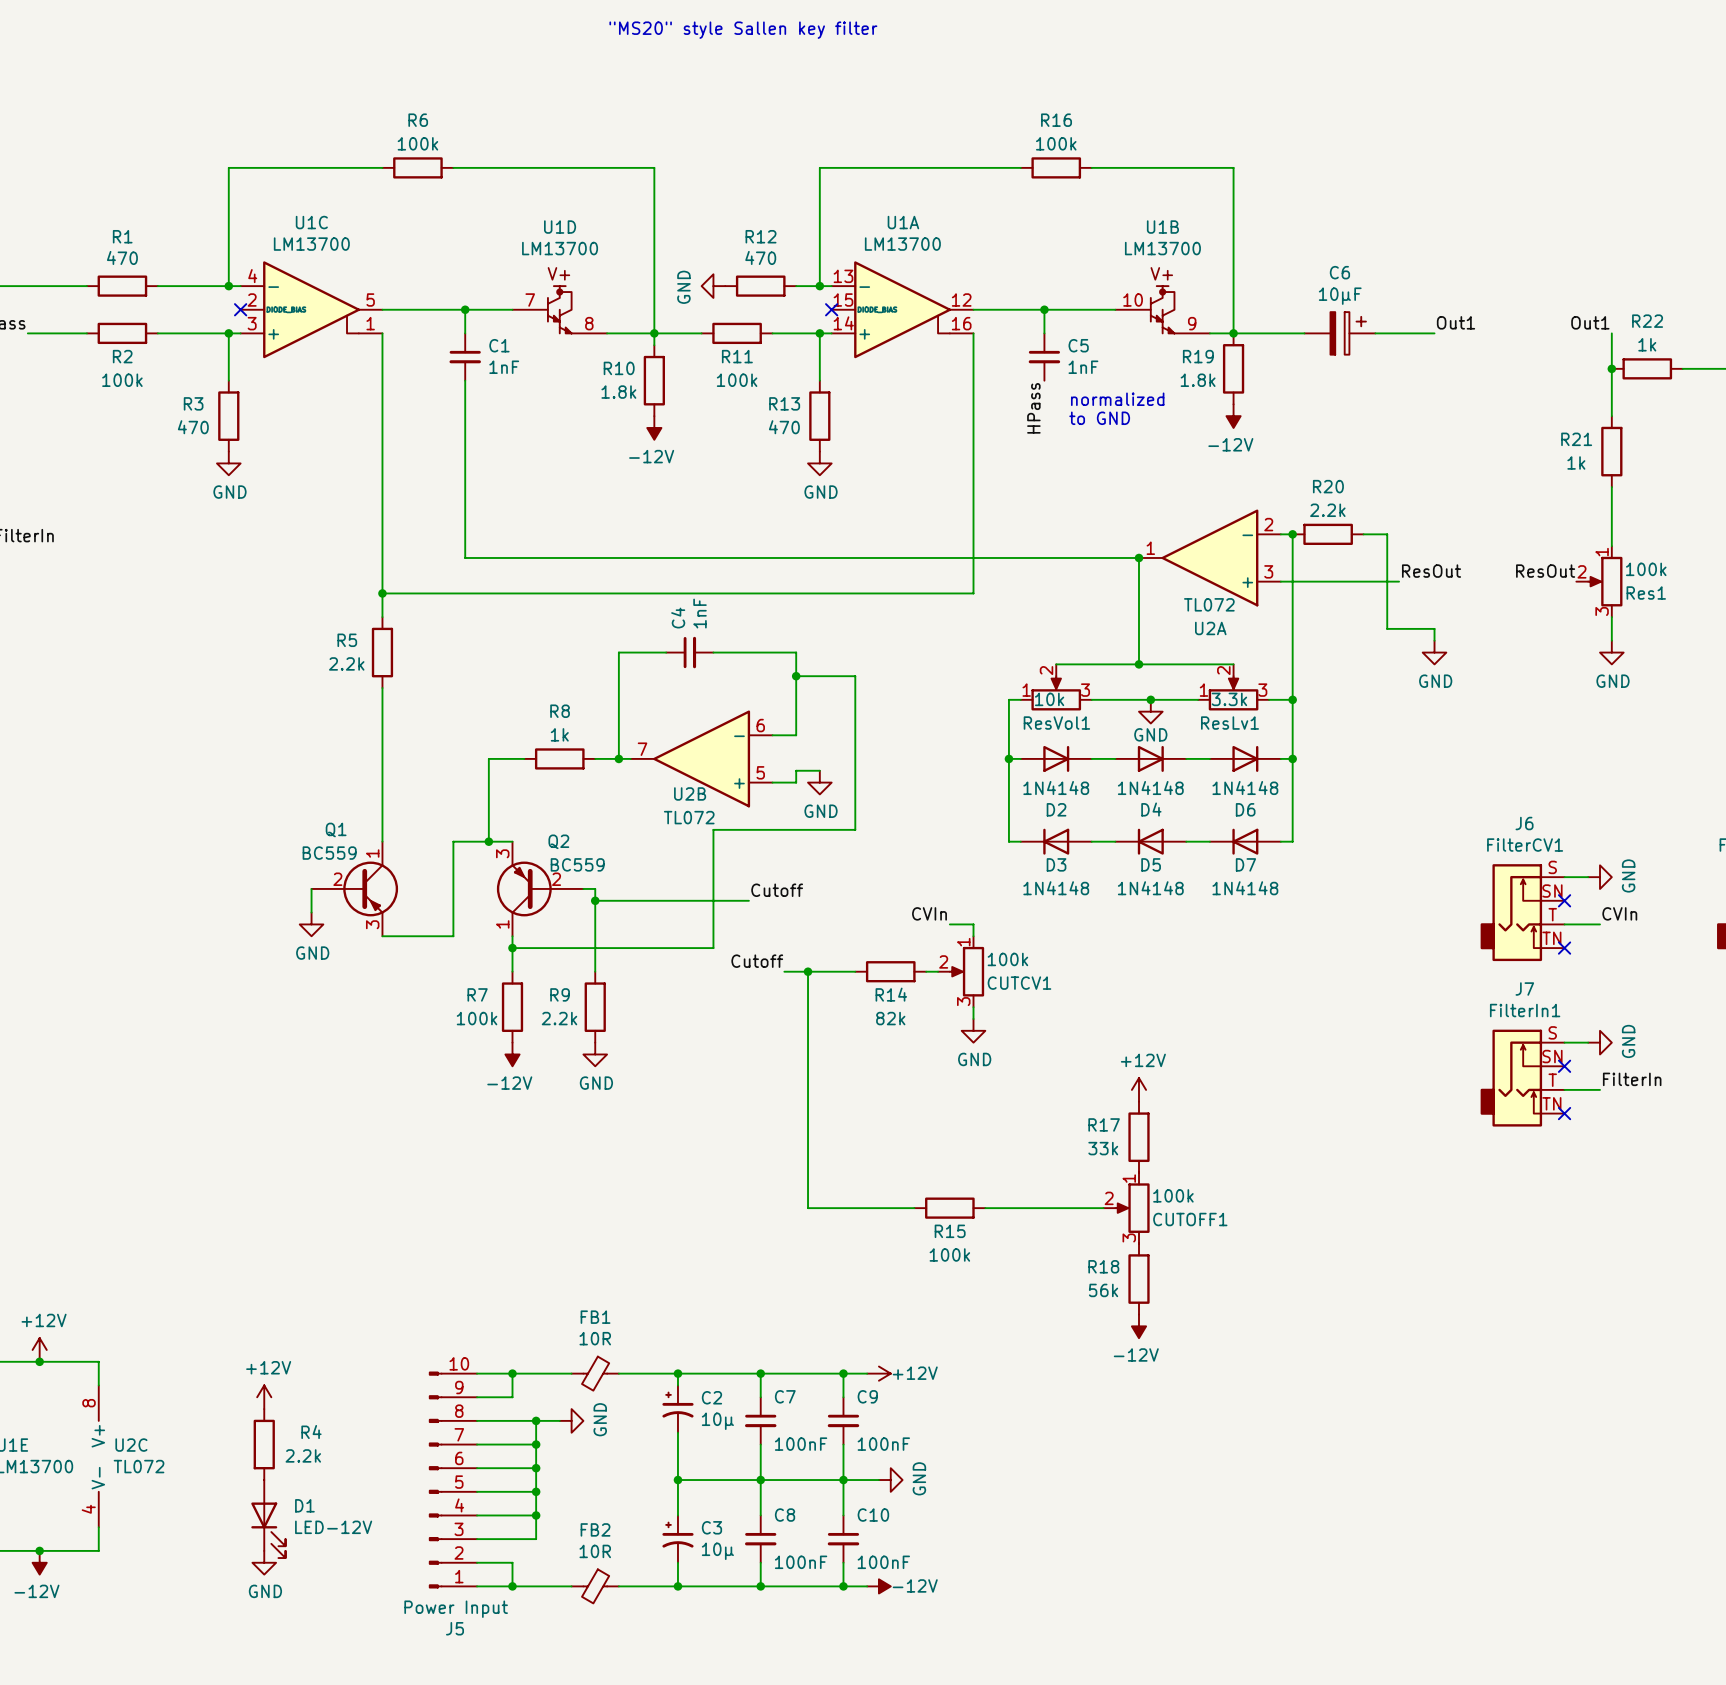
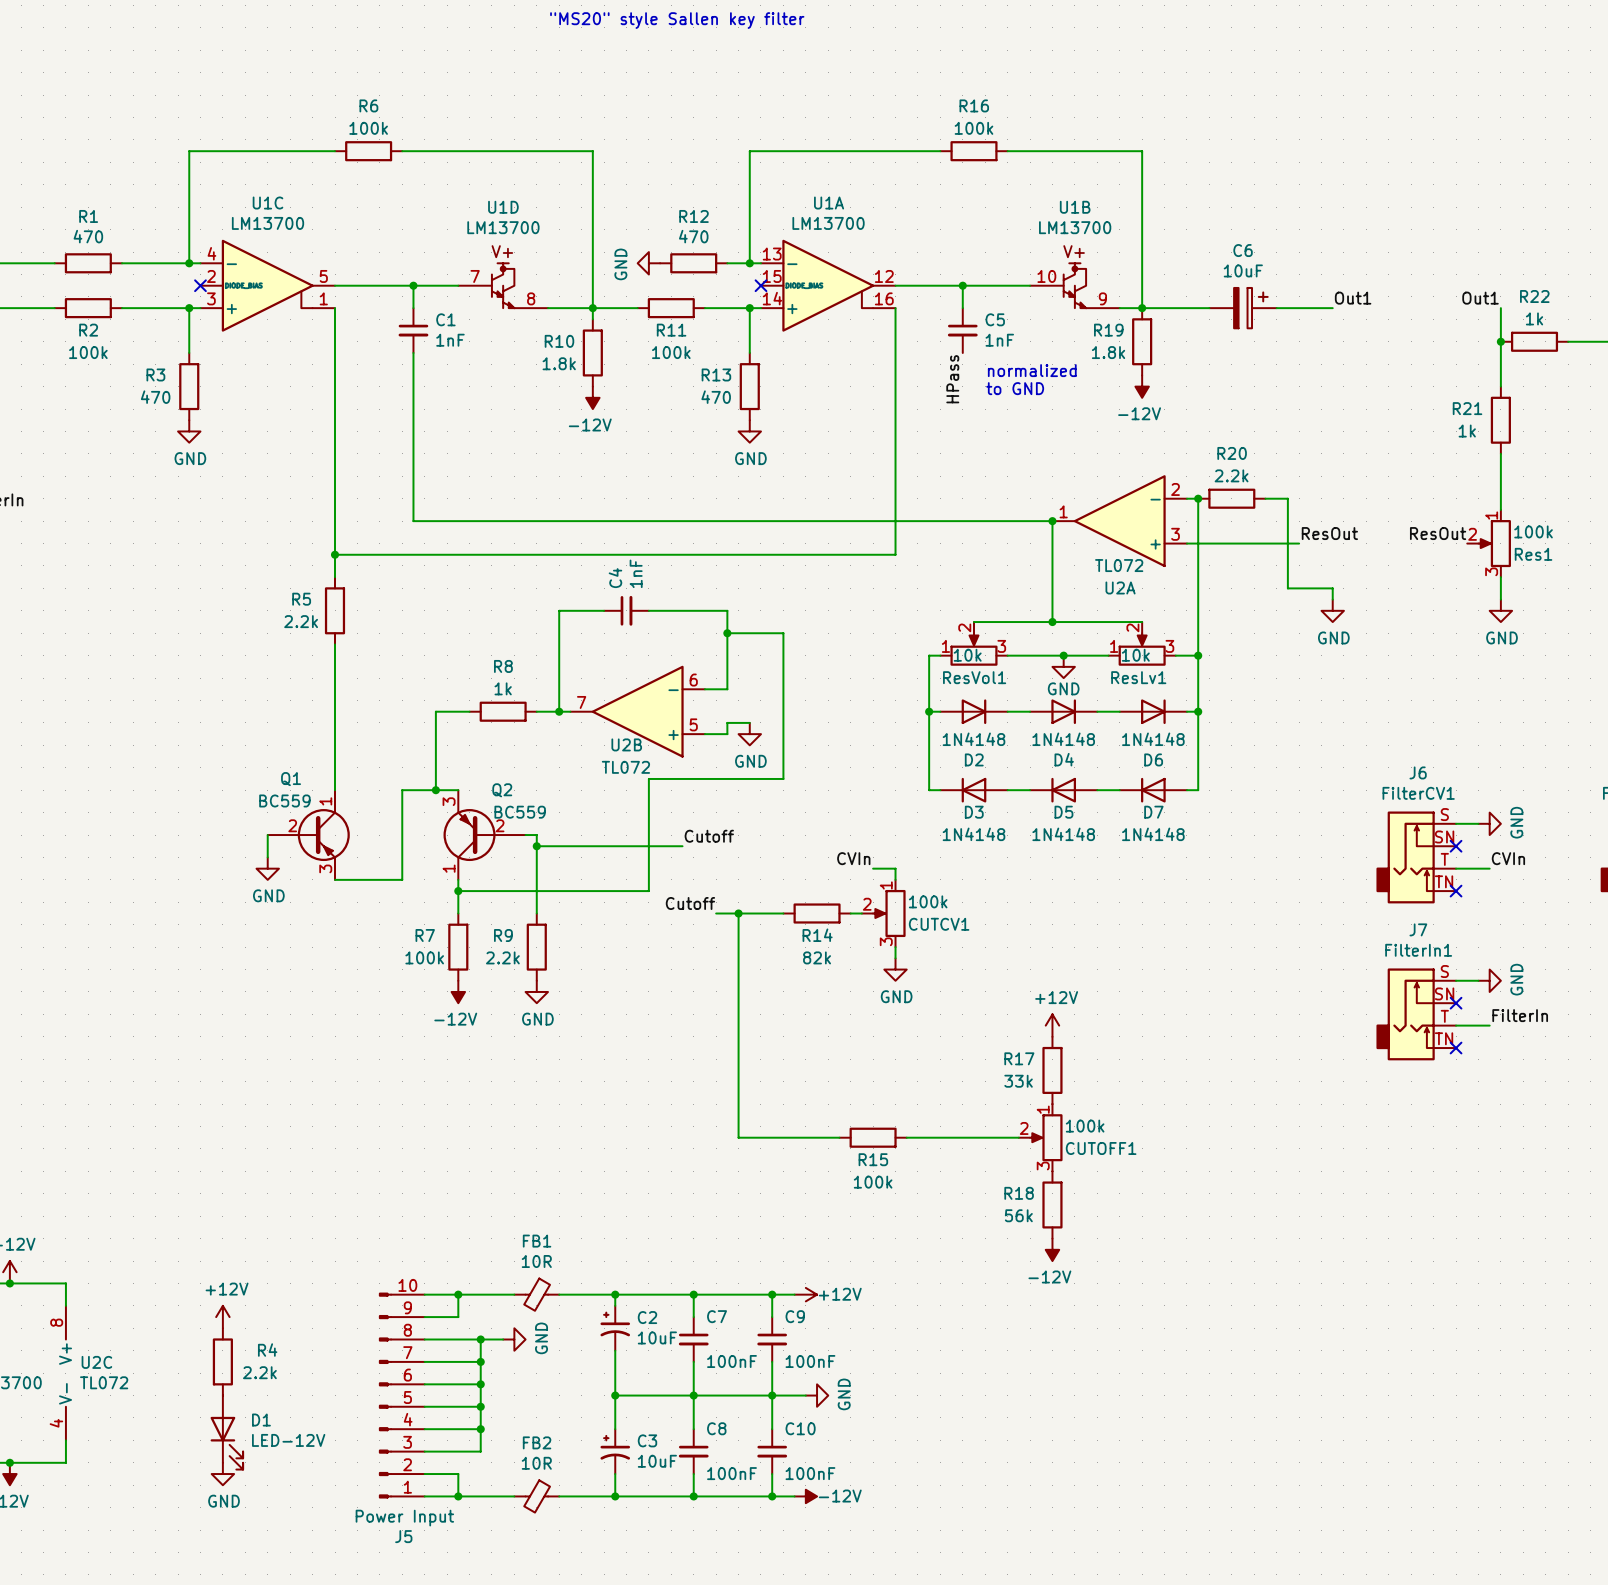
C6 value: 10µF (1340, 296) -> 10uF (1243, 270)
ResLv1 value: 3.3k (1229, 699) -> 10k (1135, 655)
C2 value: 10µ (717, 1421) -> 10uF (657, 1337)
C3 value: 10µ (717, 1551) -> 10uF (657, 1461)

